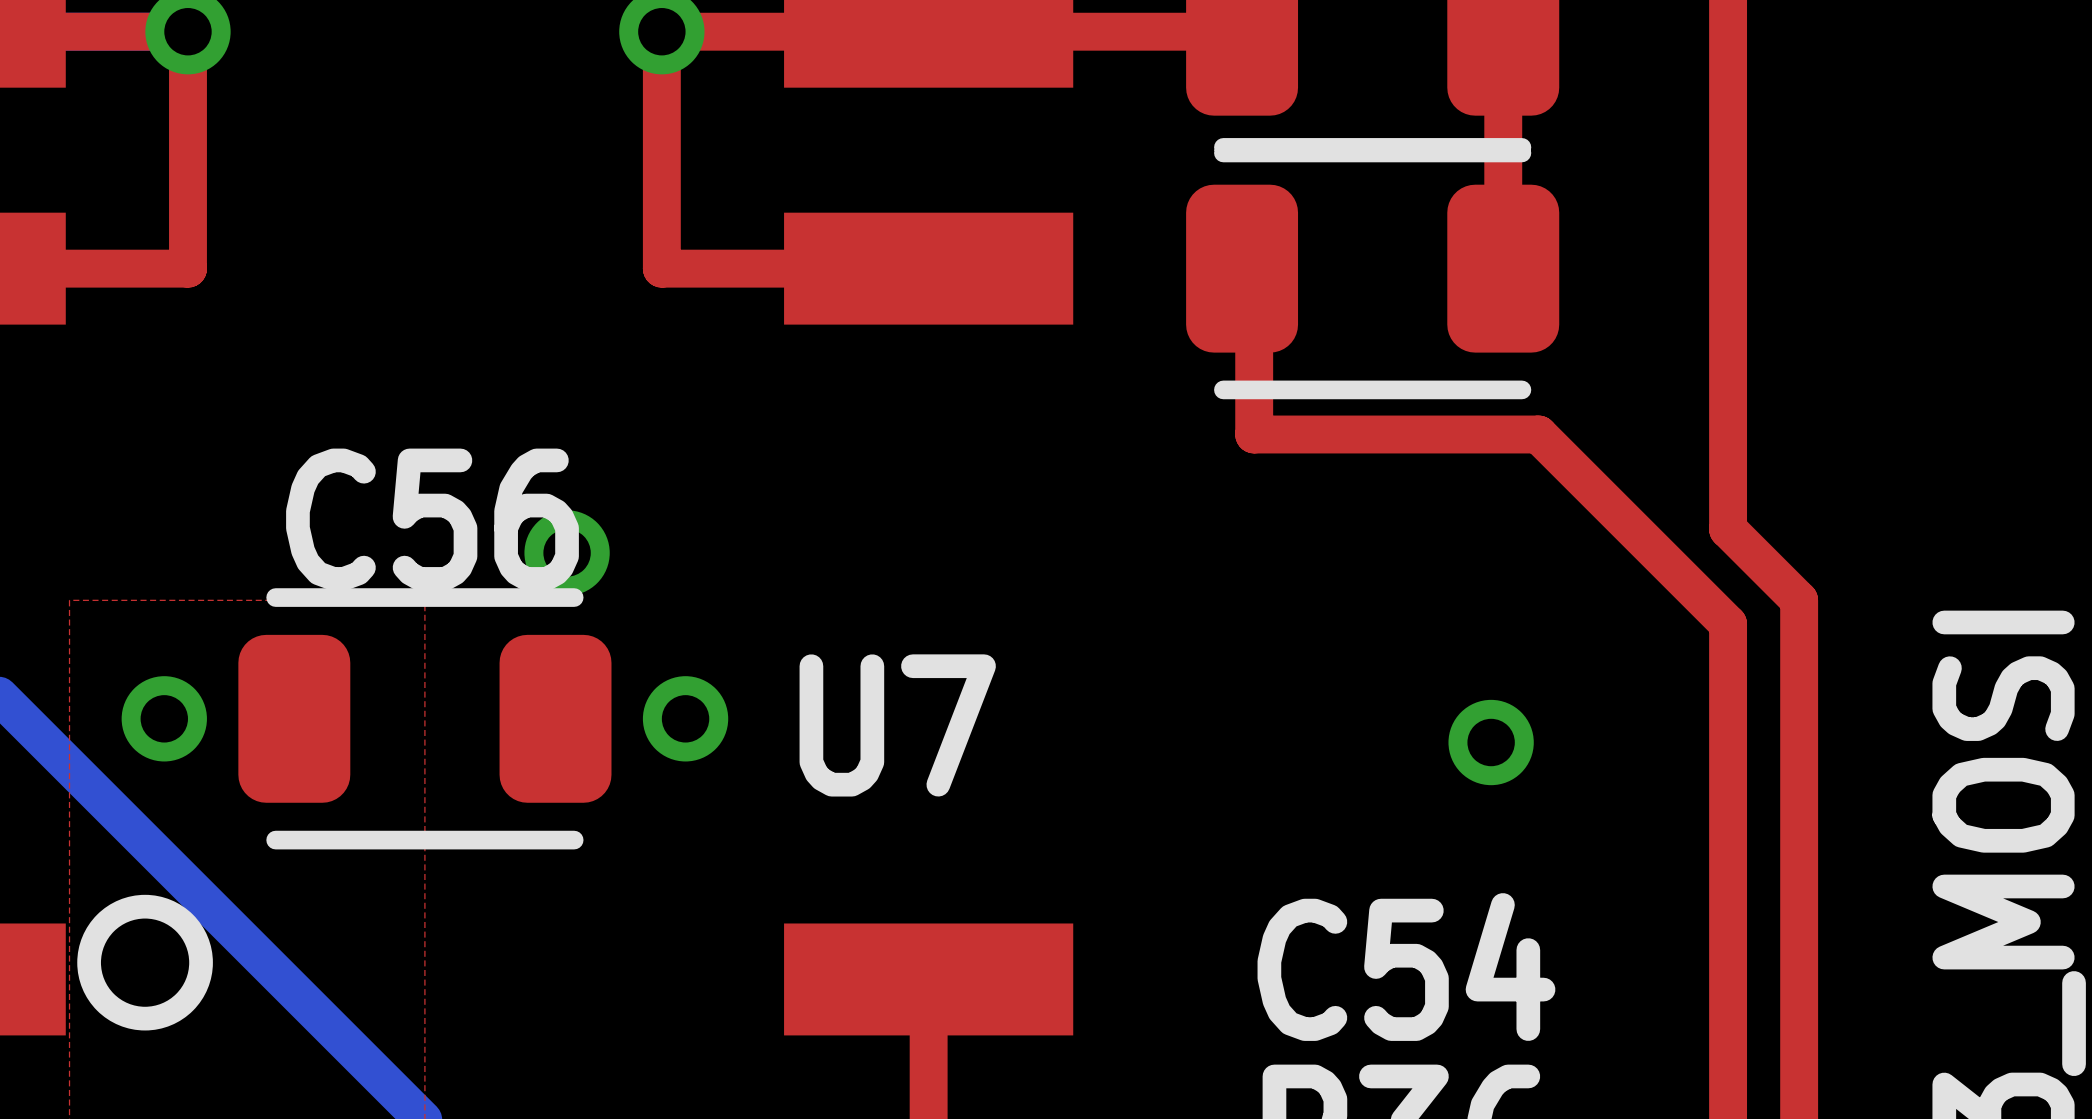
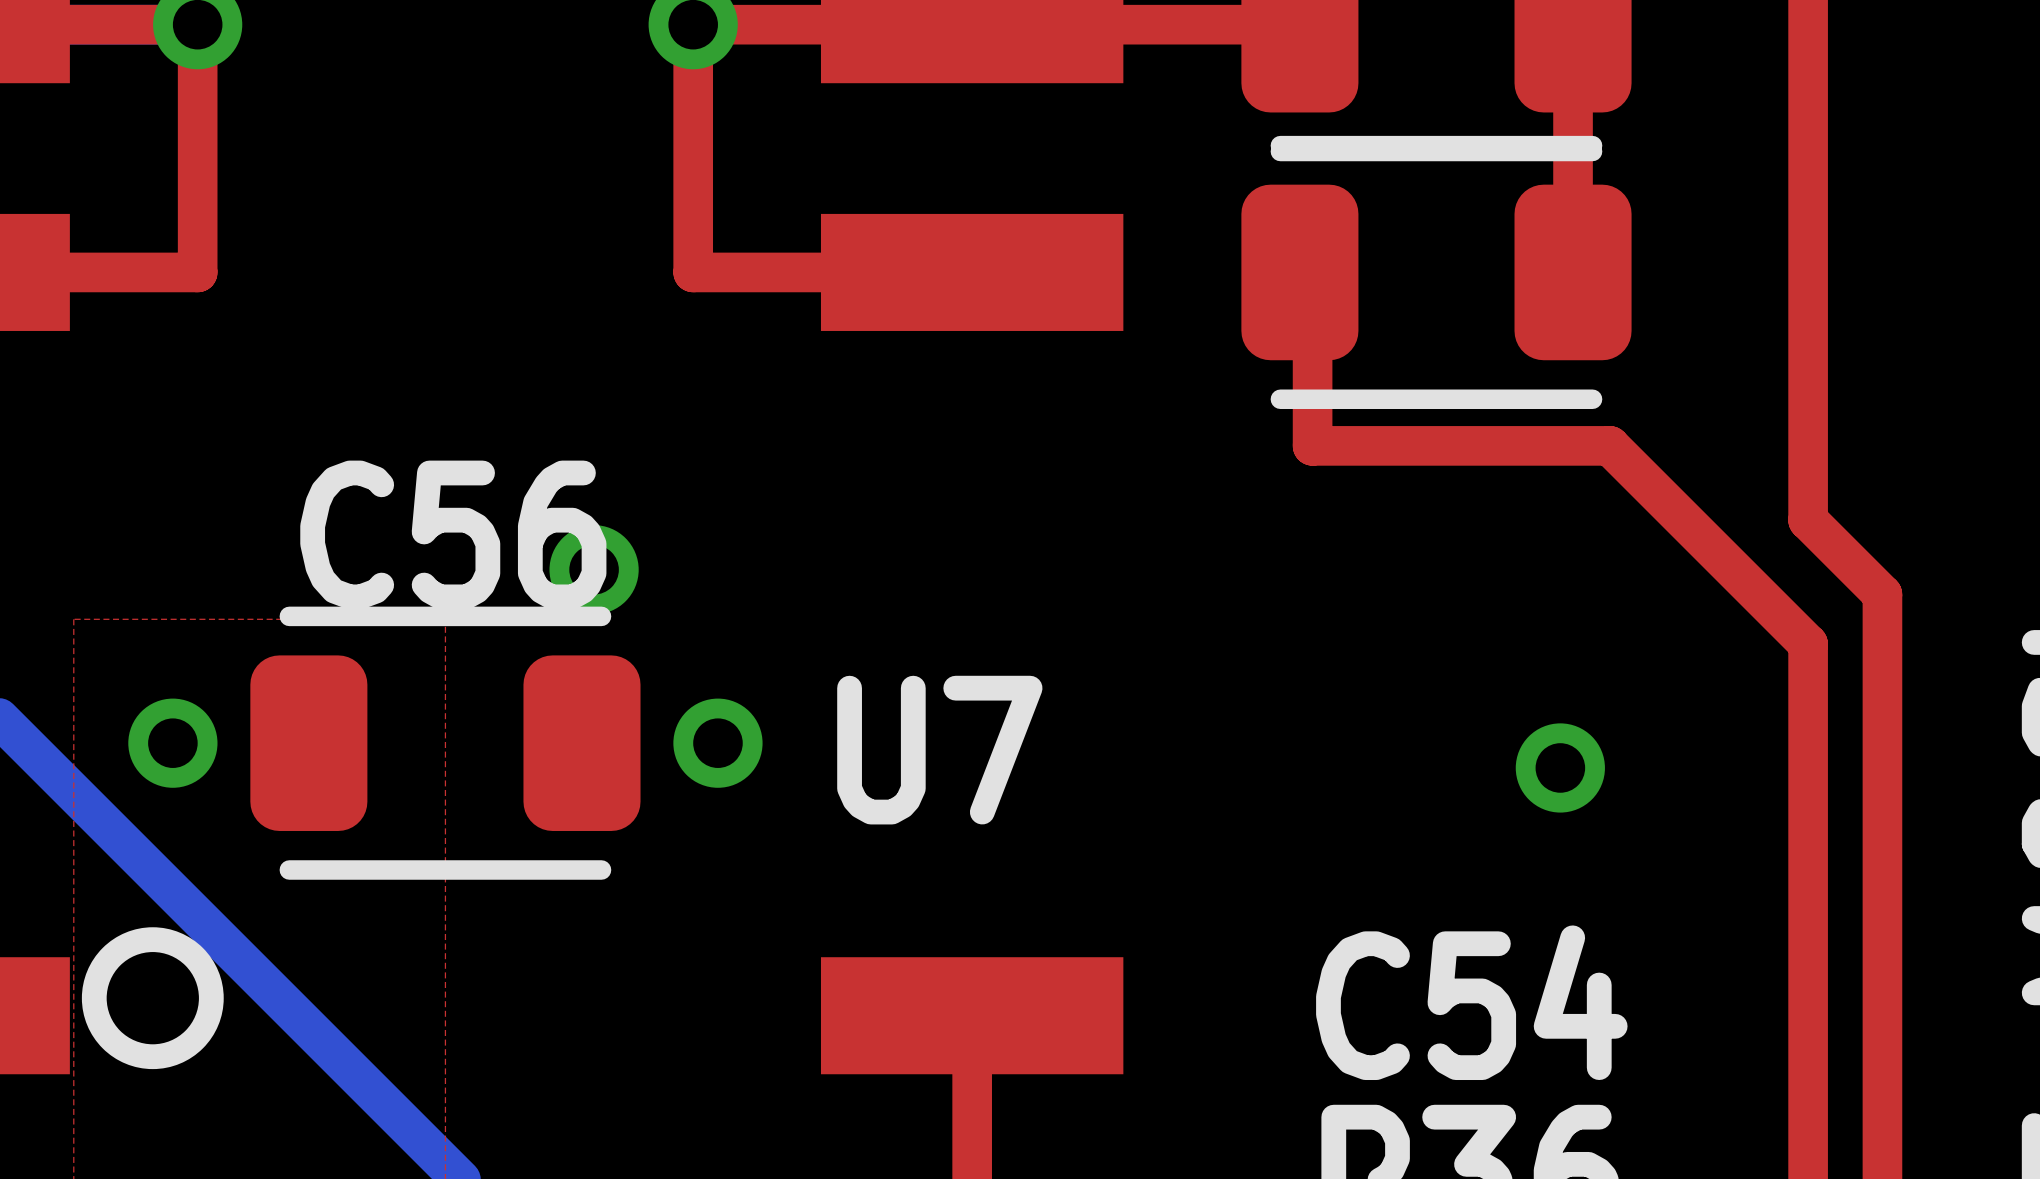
top track: (1728, 505) (1728, 529) (1799, 600) -> (1808, 520) (1882, 594) (1882, 619)

